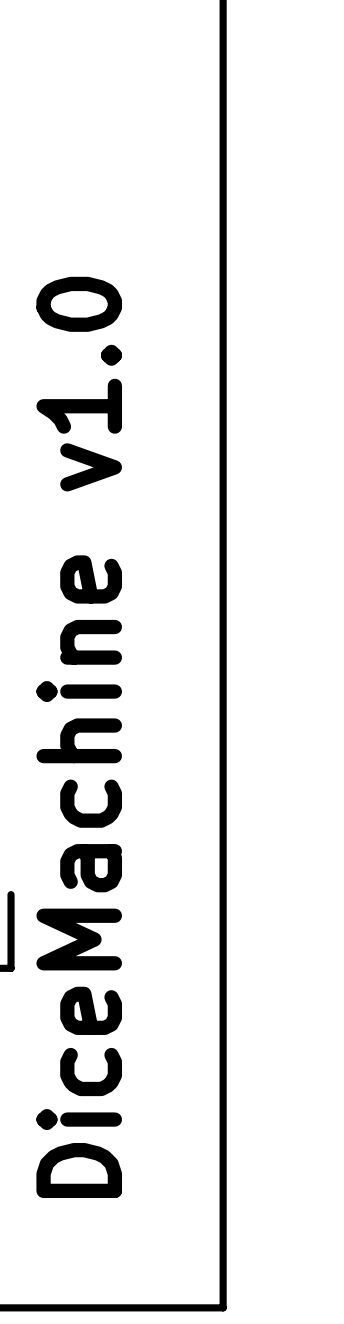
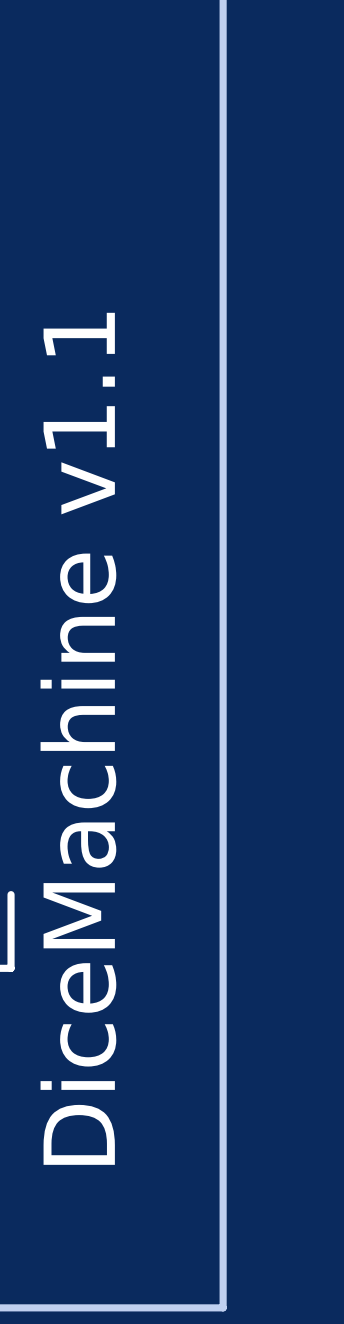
text: DiceMachine v1.0 (79, 737) -> DiceMachine v1.1 (78, 738)

